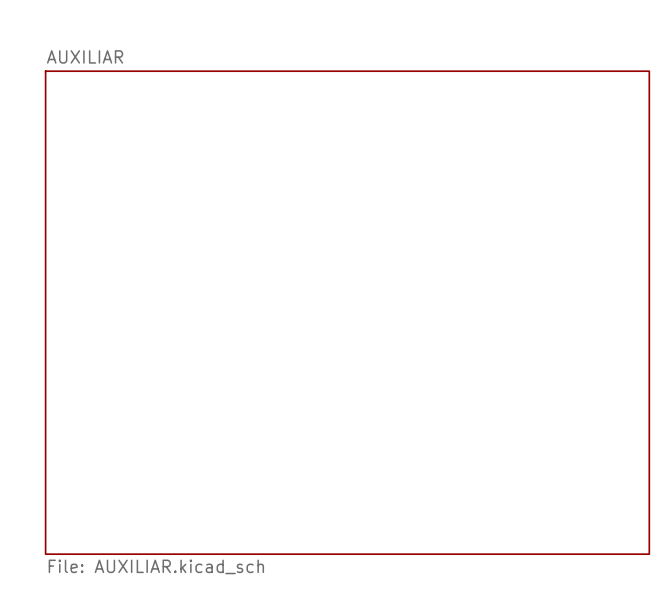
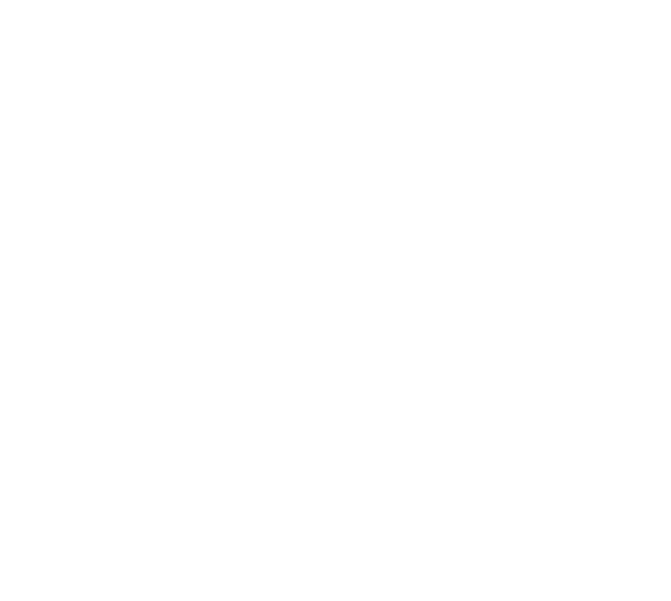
sheet AUXILIAR: File: AUXILIAR.kicad_sch (347, 312) -> none

